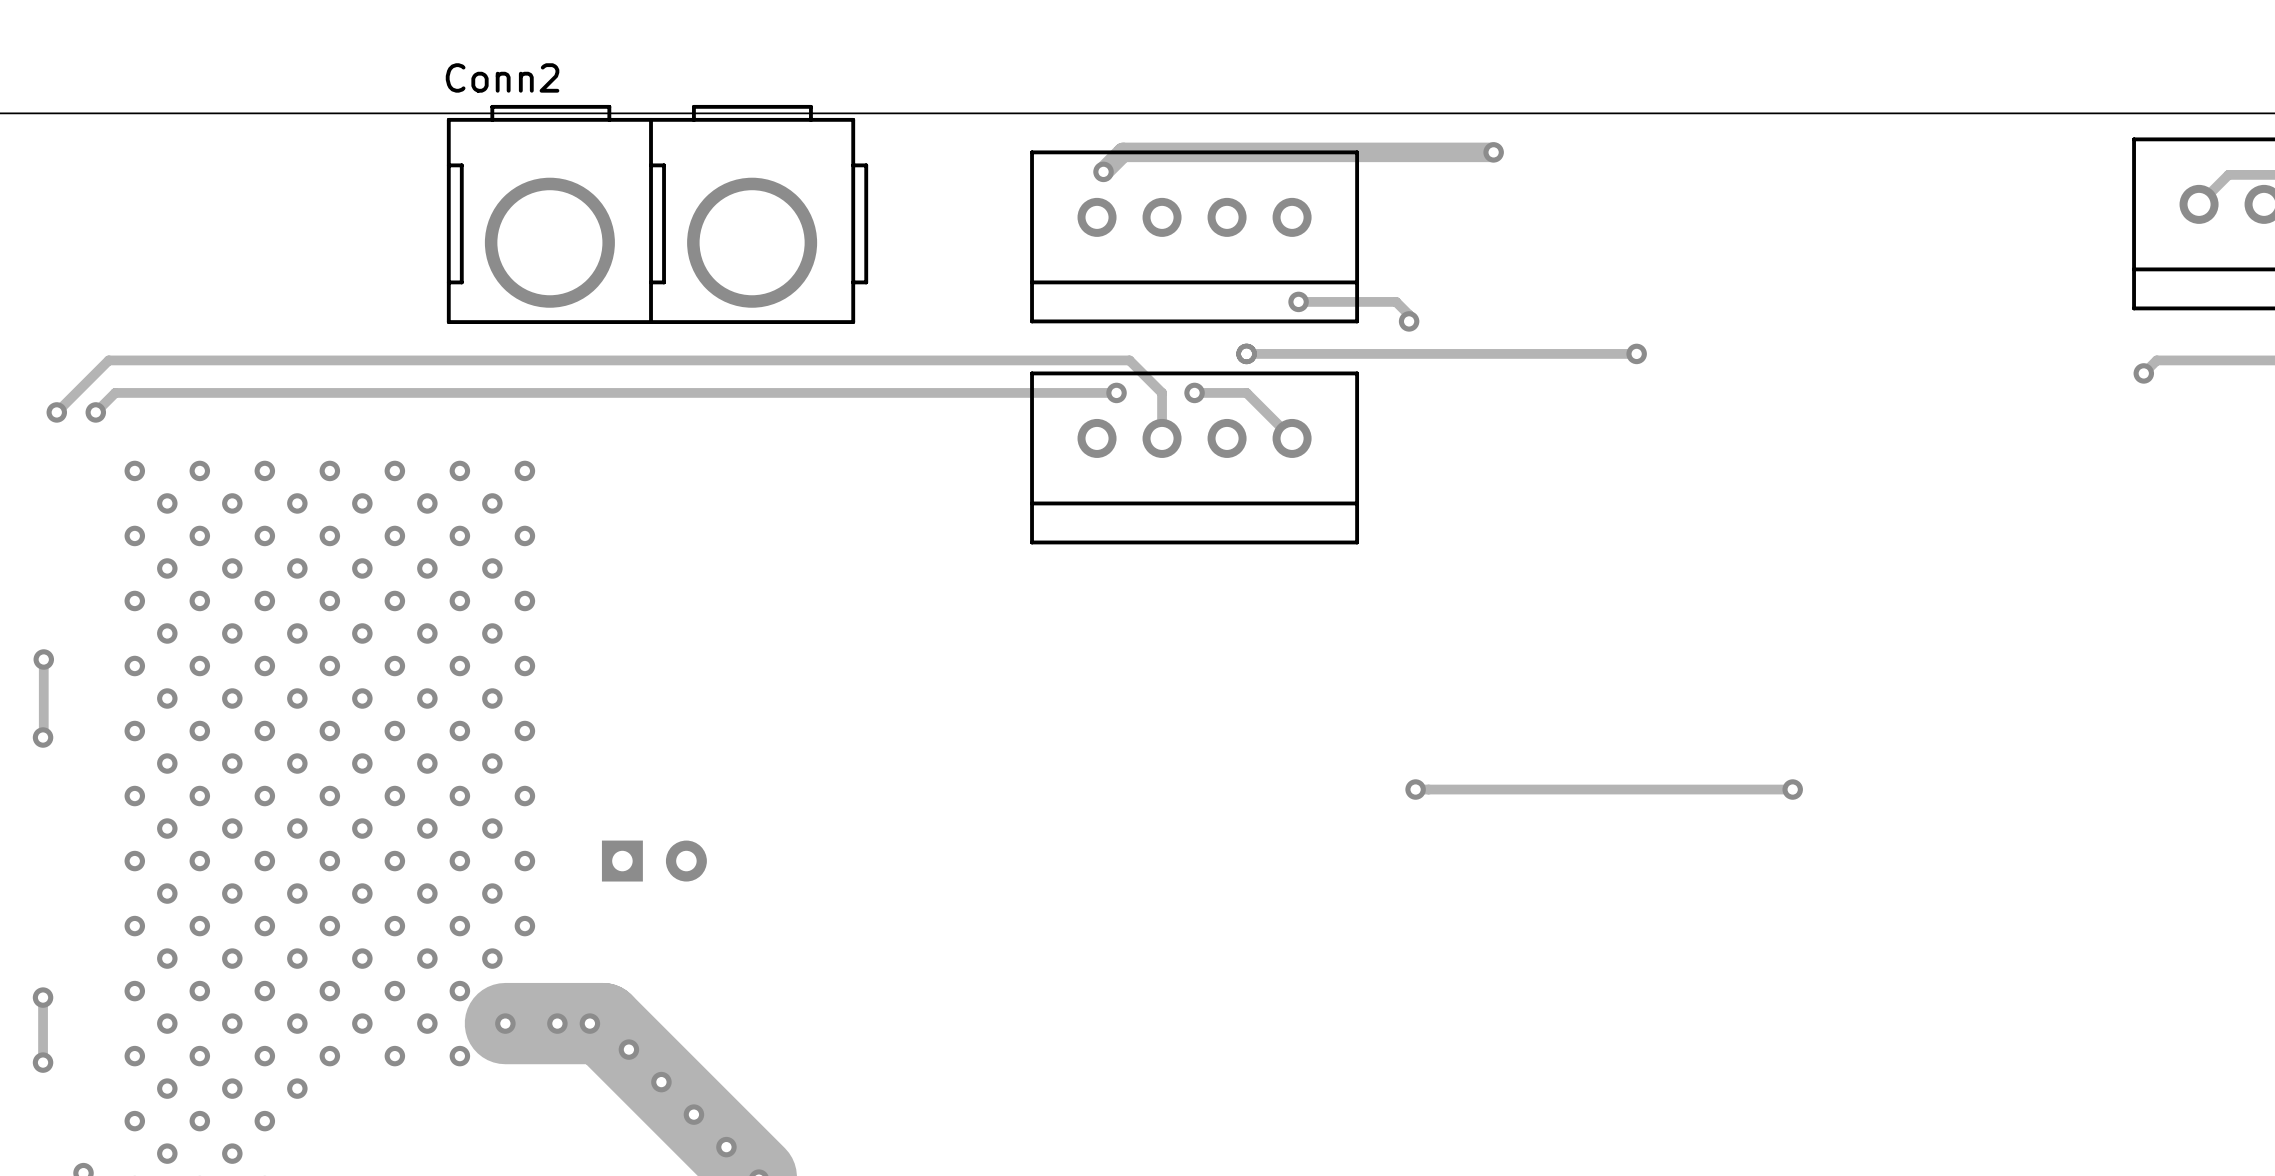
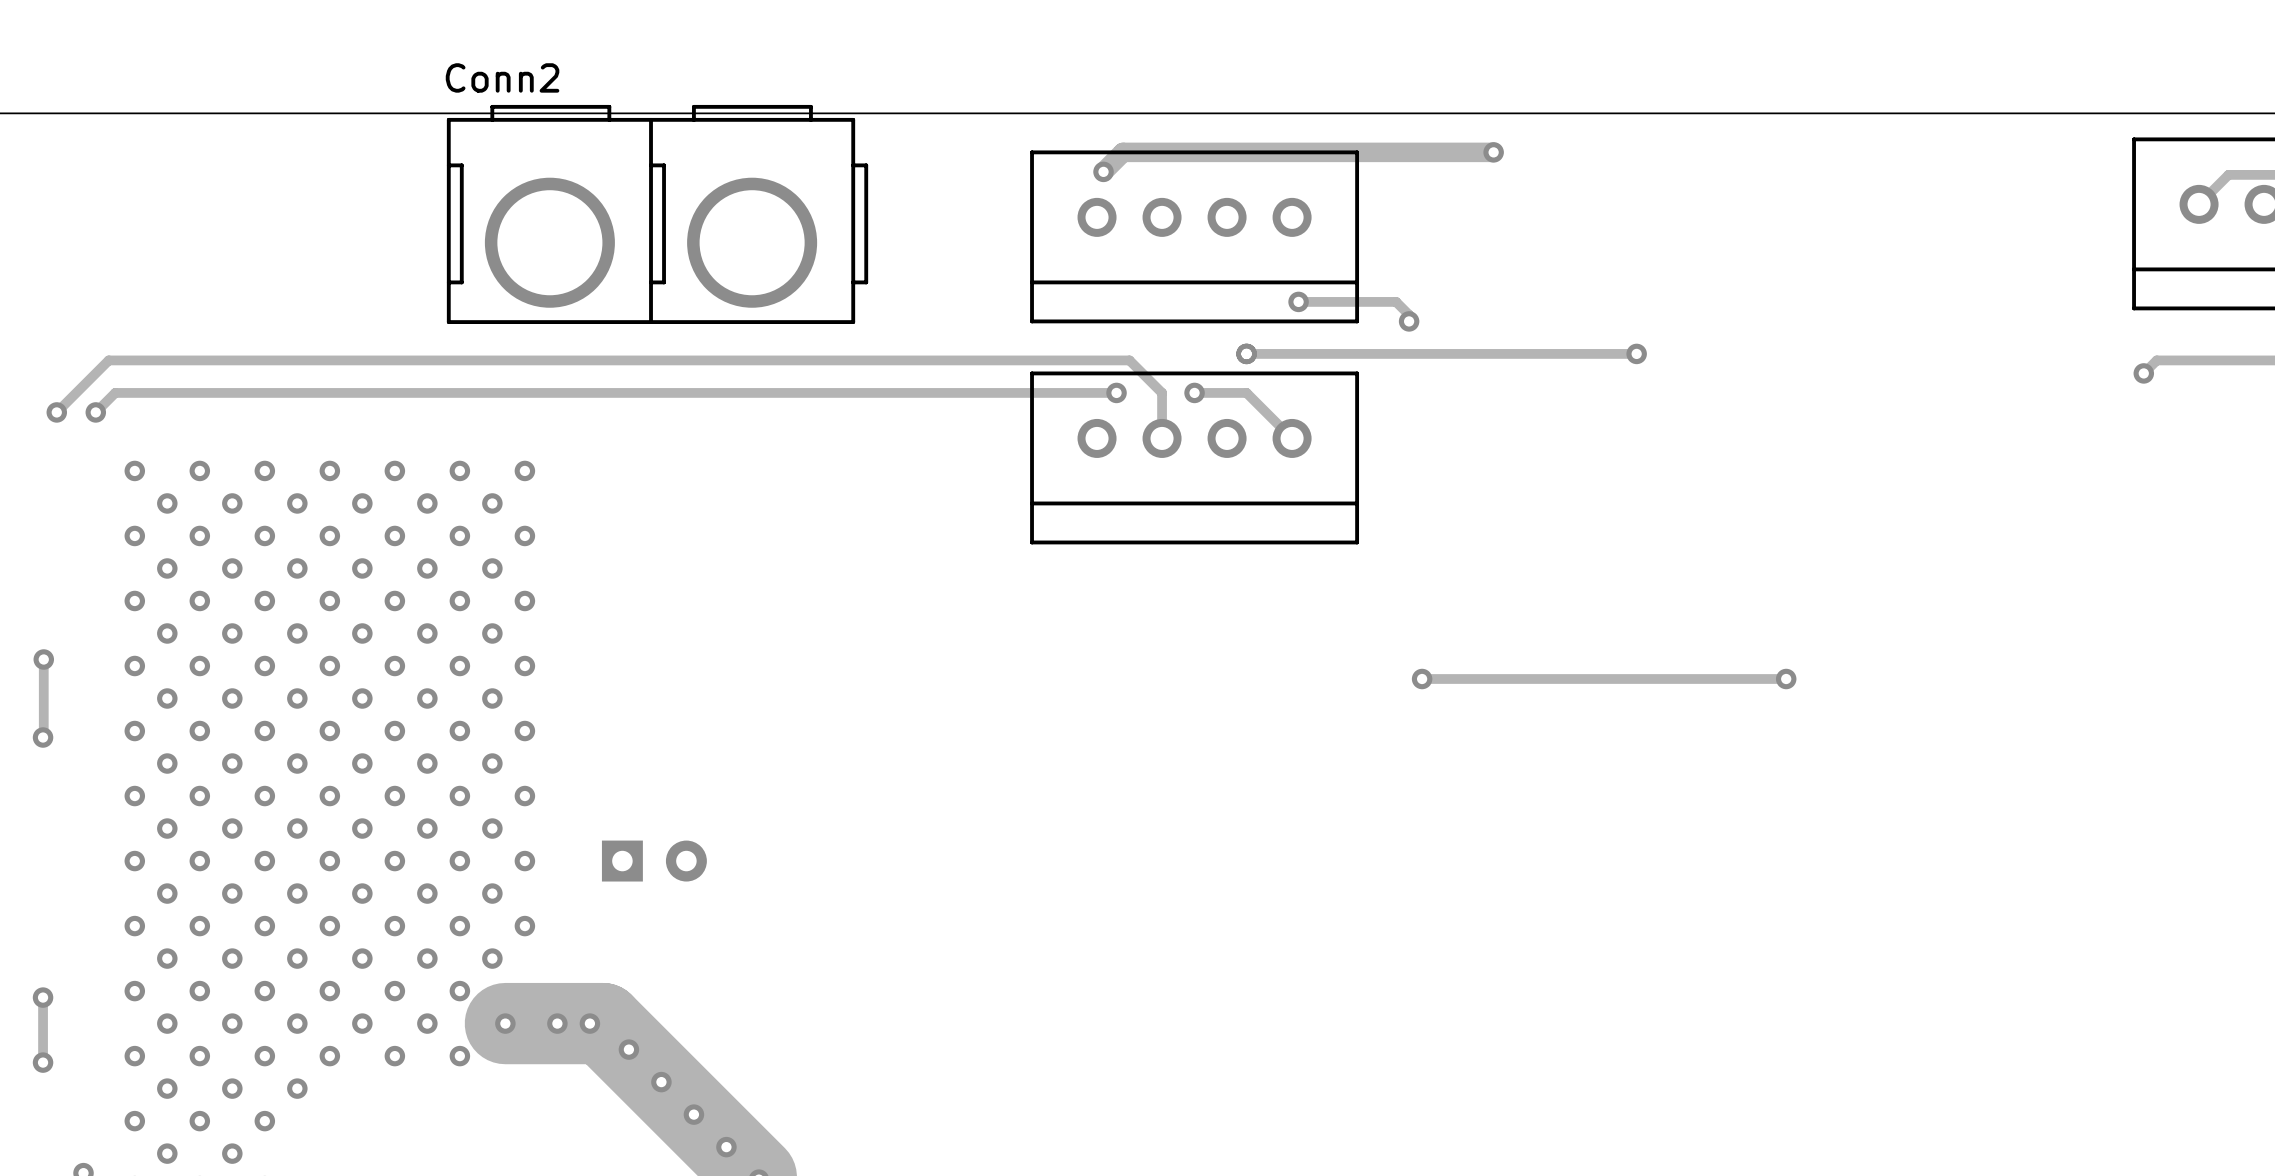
track: none -> (1786, 679) (1422, 679)
via position: (1415, 789) -> (1422, 679)
track: (1792, 789) (1415, 789) -> none
via position: (1792, 789) -> (1786, 679)

